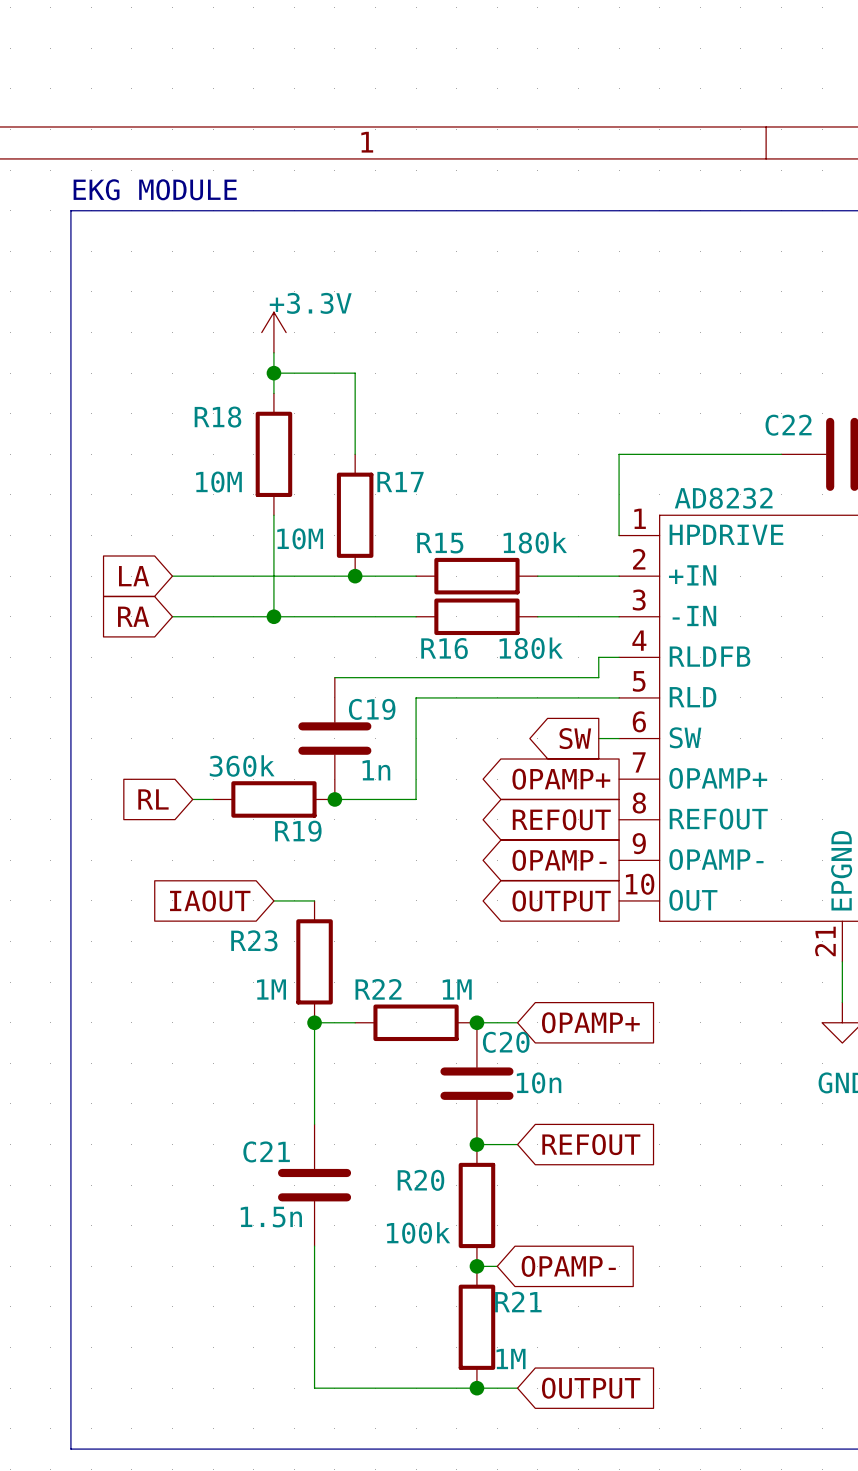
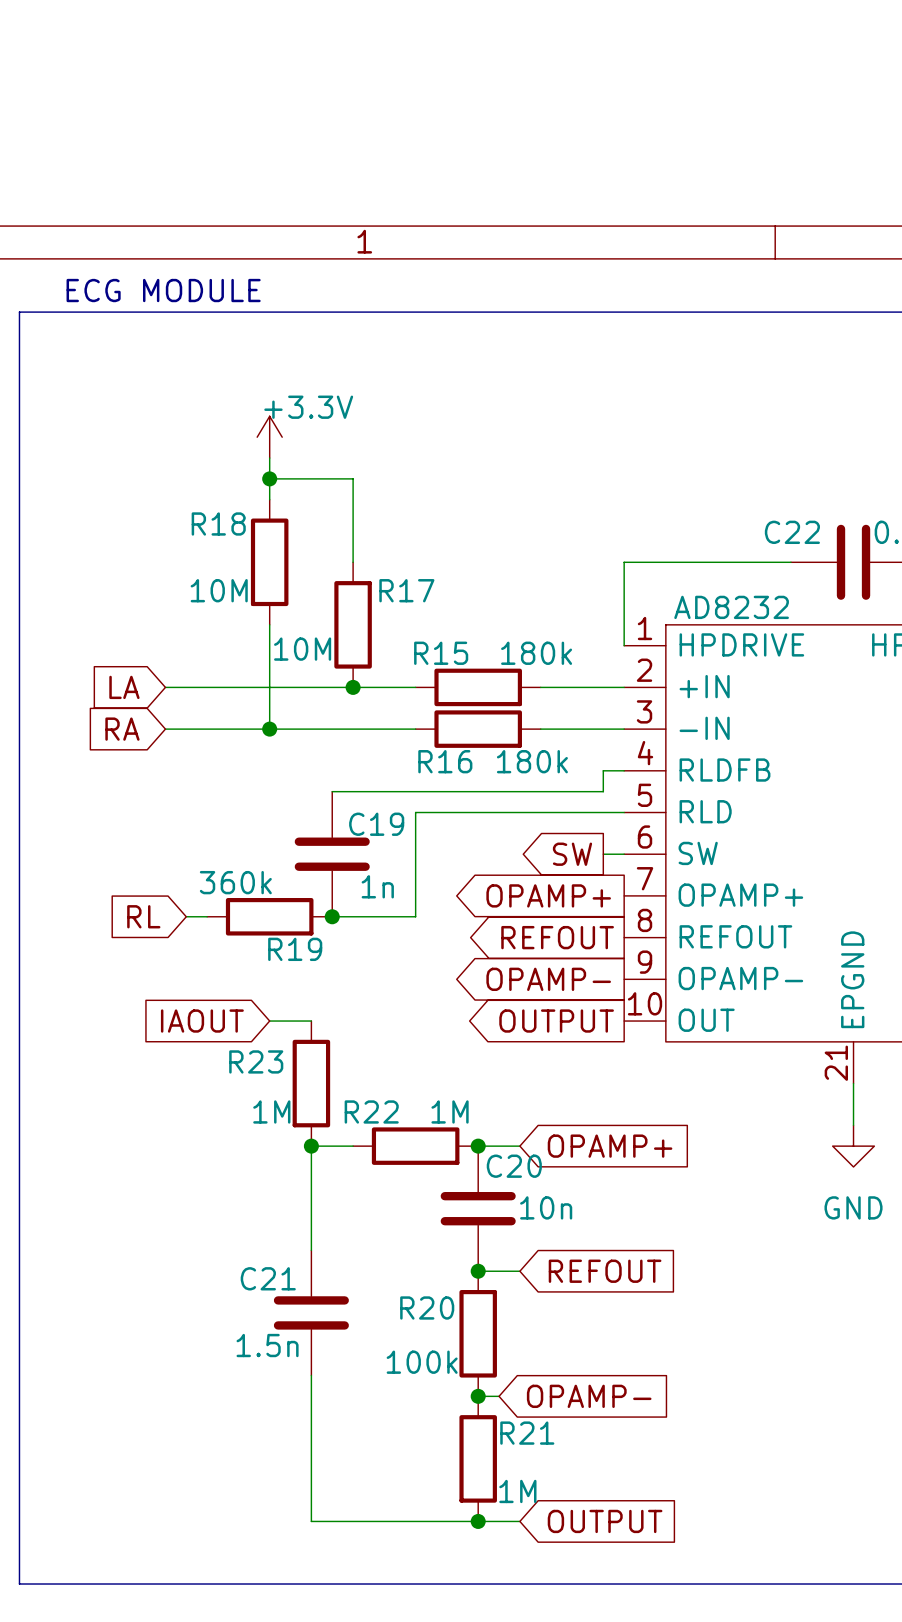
text: EKG MODULE (155, 189) -> ECG MODULE (163, 290)
line: (70, 210) (70, 1449) -> (61, 312) (19, 312) (19, 1584) (61, 1584)

